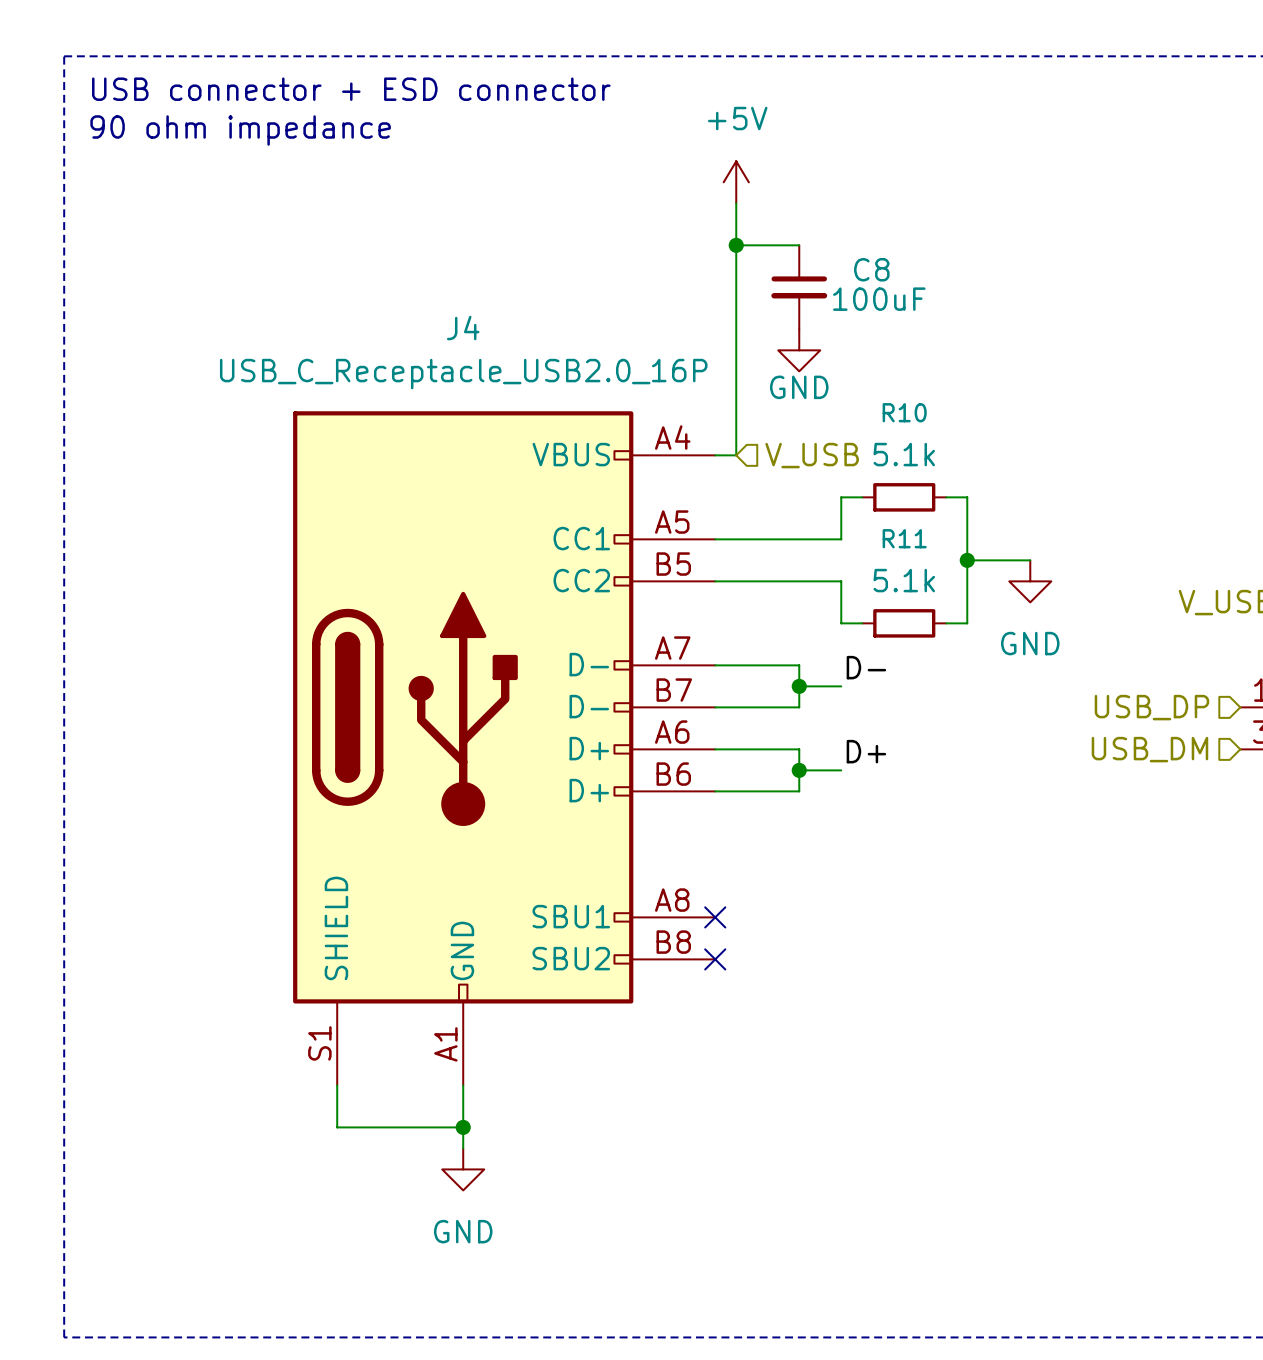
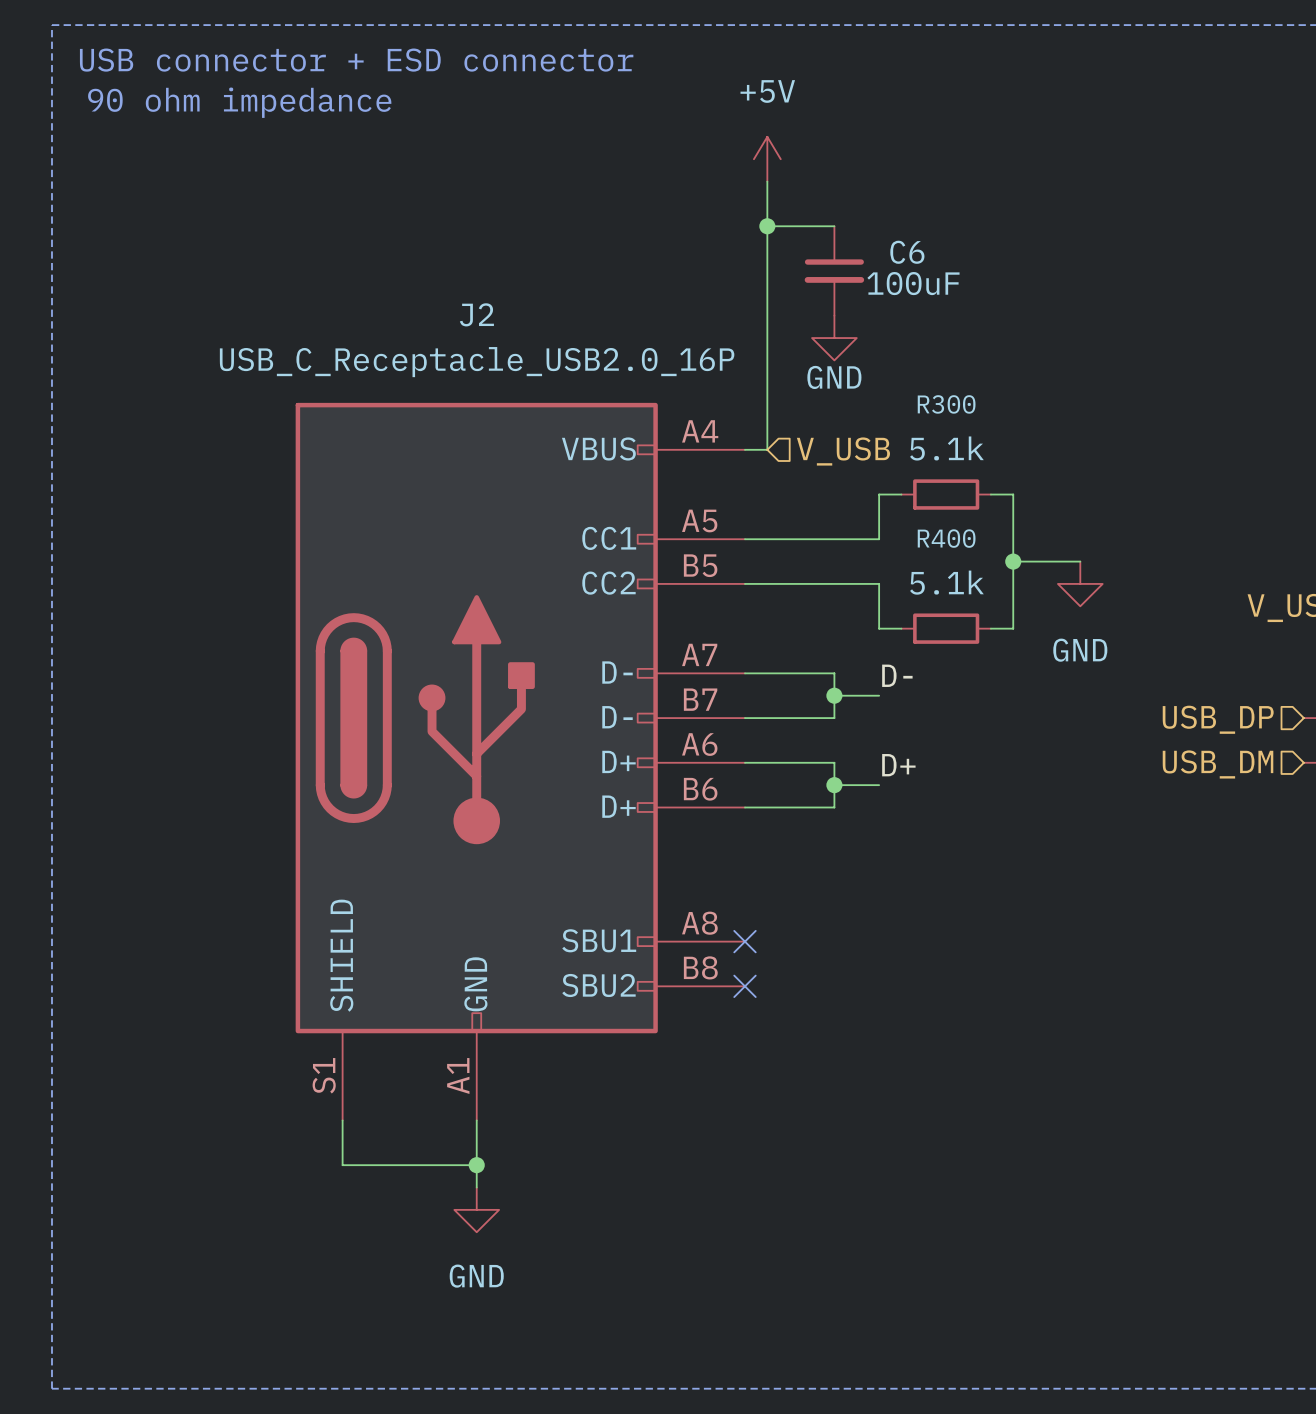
C8 name: C8 (871, 269) -> C6 (907, 252)
J4 name: J4 (463, 328) -> J2 (476, 314)
R10 name: R10 (904, 412) -> R300 (946, 404)
R11 name: R11 (904, 538) -> R400 (946, 538)

